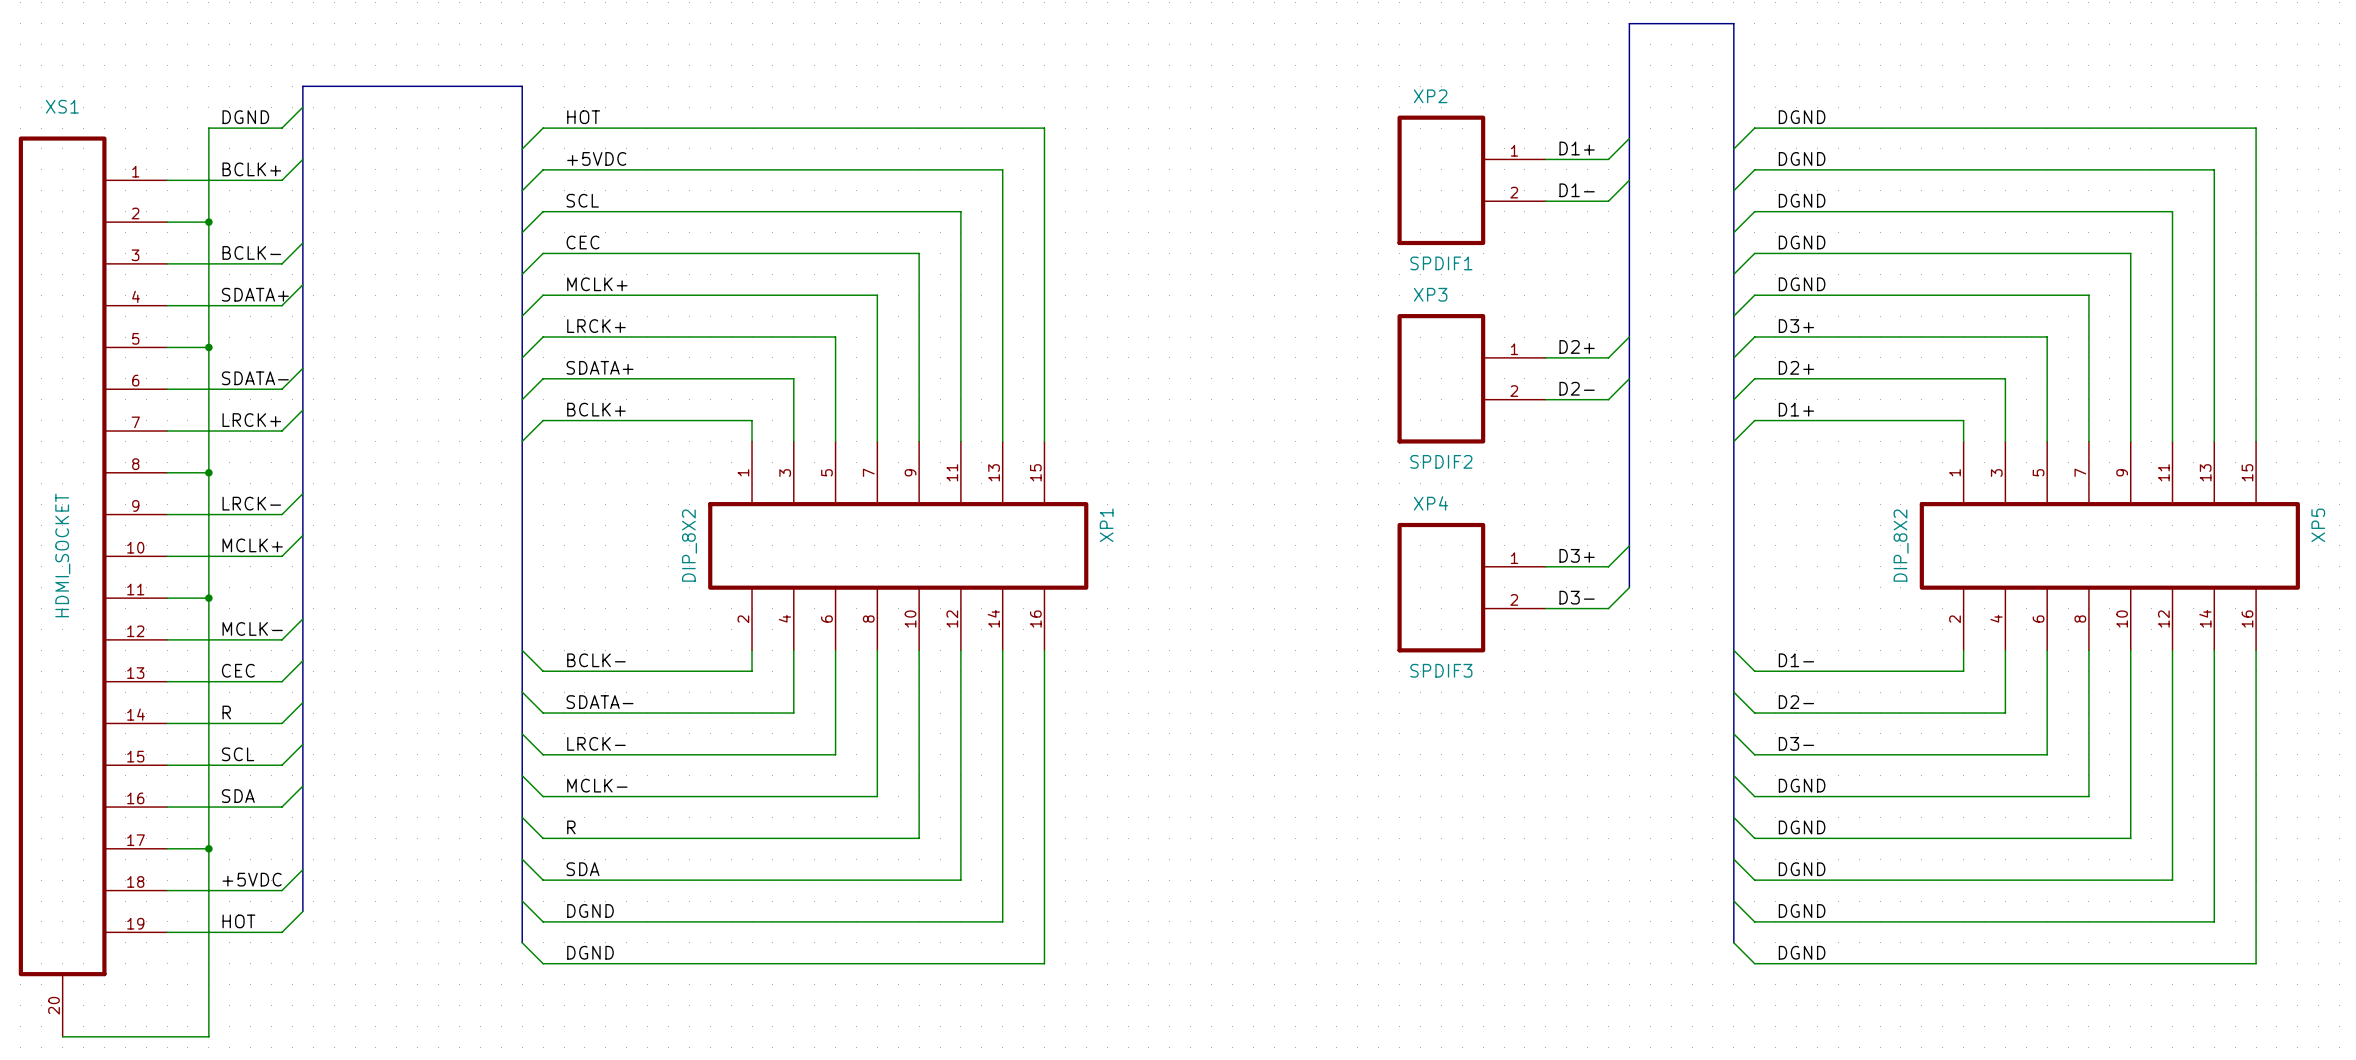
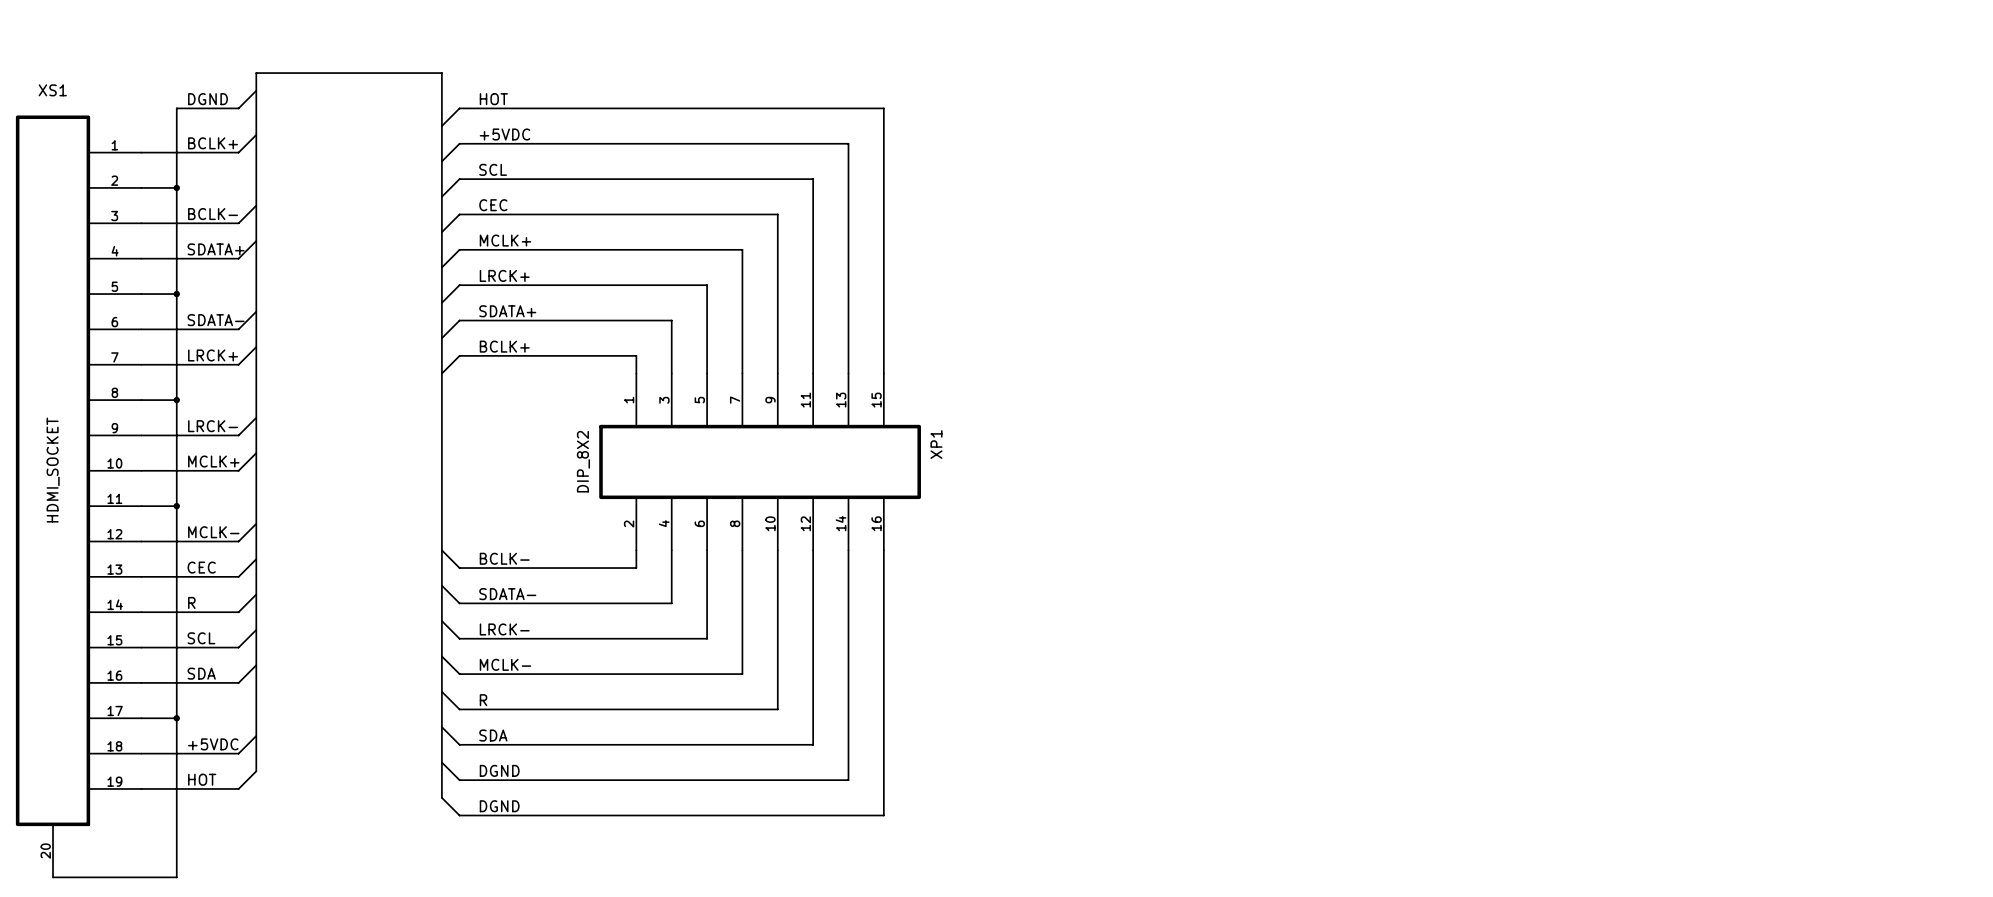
label: DGND (1802, 117) -> none
wire: (1629, 138) (1608, 159) (1545, 159) -> none
label: D1+ (1577, 148) -> none
wire: (1733, 148) (1754, 128) (2256, 128) (2256, 441) -> none
label: DGND (1802, 158) -> none
XP2: SPDIF1 (1471, 180) -> none
wire: (1629, 180) (1608, 201) (1545, 201) -> none
label: D1- (1577, 190) -> none
wire: (1733, 190) (1754, 169) (2214, 169) (2214, 441) -> none
label: DGND (1802, 200) -> none
wire: (1733, 232) (1754, 211) (2172, 211) (2172, 441) -> none
label: DGND (1802, 242) -> none
wire: (1733, 274) (1754, 253) (2130, 253) (2130, 441) -> none
label: DGND (1802, 284) -> none
wire: (1733, 316) (1754, 295) (2088, 295) (2088, 441) -> none
label: D3+ (1796, 326) -> none
wire: (1629, 337) (1608, 357) (1545, 357) -> none
label: D2+ (1577, 346) -> none
wire: (1733, 357) (1754, 337) (2047, 337) (2047, 441) -> none
label: D2+ (1796, 367) -> none
XP3: SPDIF2 (1471, 378) -> none
wire: (1629, 378) (1608, 399) (1545, 399) -> none
label: D2- (1577, 388) -> none
wire: (1733, 399) (1754, 378) (2005, 378) (2005, 441) -> none
label: D1+ (1796, 409) -> none
wire: (1733, 441) (1754, 420) (1963, 420) (1963, 441) -> none
wire: (1629, 545) (1608, 566) (1545, 566) -> none
XP5: DIP_8X2 (2109, 545) -> none
label: D3+ (1577, 555) -> none
XP4: SPDIF3 (1471, 587) -> none
bus: (1629, 587) (1629, 23) (1733, 23) (1733, 942) -> none
wire: (1629, 587) (1608, 608) (1545, 608) -> none
label: D3- (1577, 597) -> none
wire: (1733, 650) (1754, 671) (1963, 671) (1963, 650) -> none
wire: (2005, 650) (2005, 713) (1754, 713) (1733, 692) -> none
wire: (2047, 650) (2047, 754) (1754, 754) (1733, 733) -> none
wire: (2088, 650) (2088, 796) (1754, 796) (1733, 775) -> none
wire: (2130, 650) (2130, 838) (1754, 838) (1733, 817) -> none
wire: (2172, 650) (2172, 880) (1754, 880) (1733, 859) -> none
wire: (2214, 650) (2214, 921) (1754, 921) (1733, 901) -> none
wire: (2256, 650) (2256, 963) (1754, 963) (1733, 942) -> none
label: D1- (1796, 660) -> none
label: D2- (1796, 702) -> none
label: D3- (1796, 743) -> none
label: DGND (1802, 785) -> none
label: DGND (1802, 827) -> none
label: DGND (1802, 869) -> none
label: DGND (1802, 910) -> none
label: DGND (1802, 952) -> none

